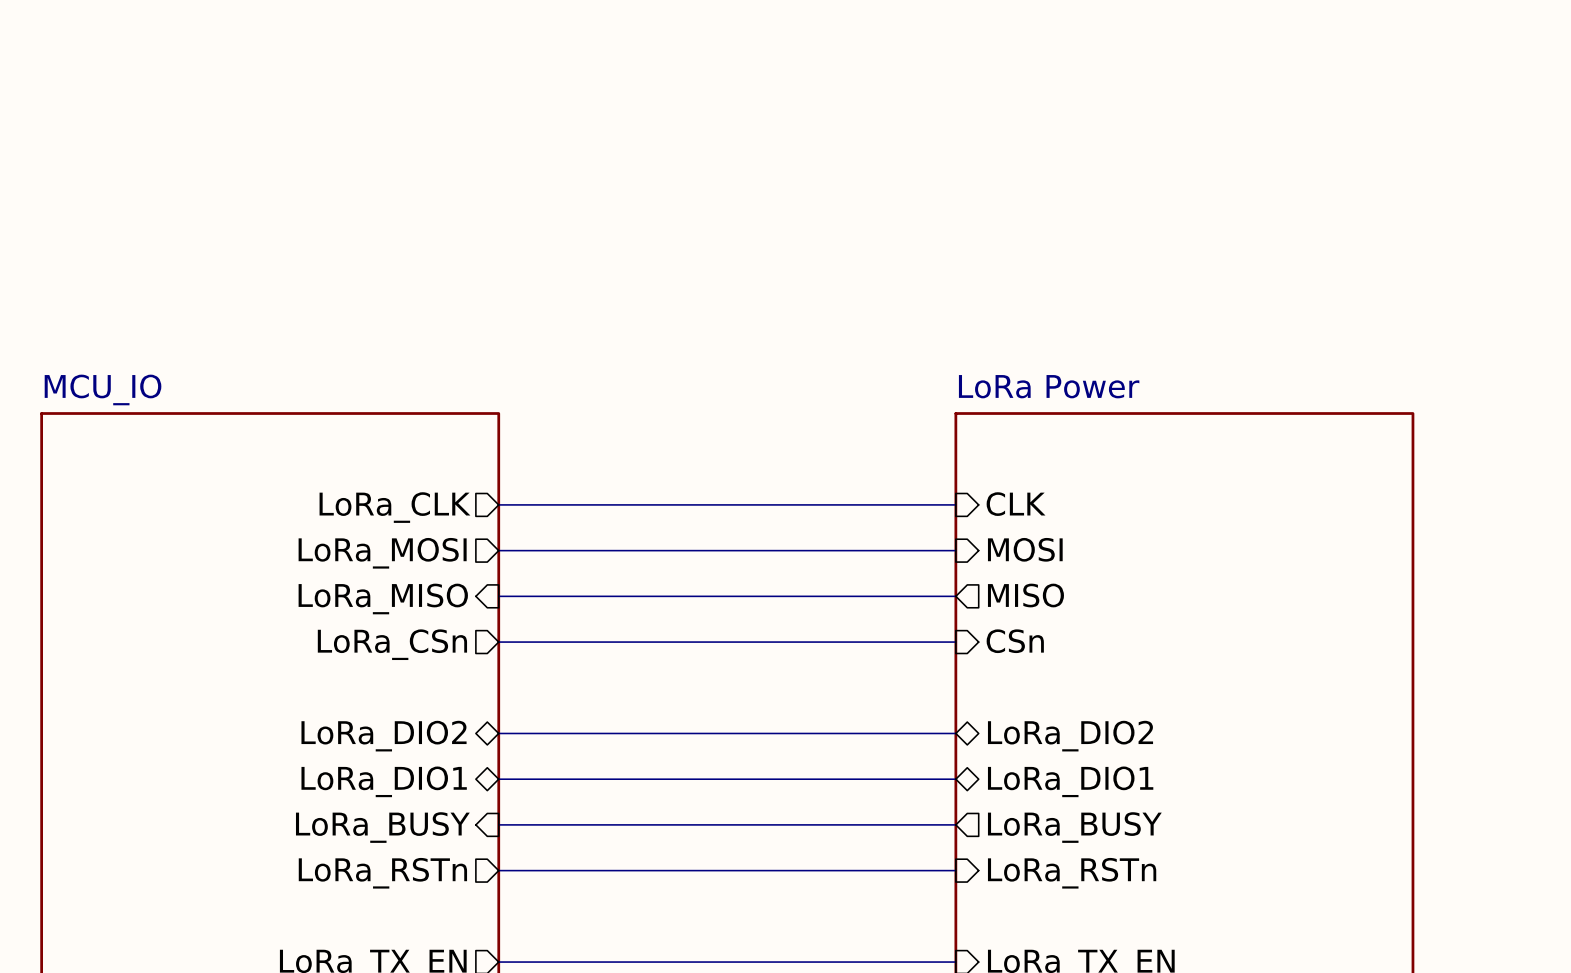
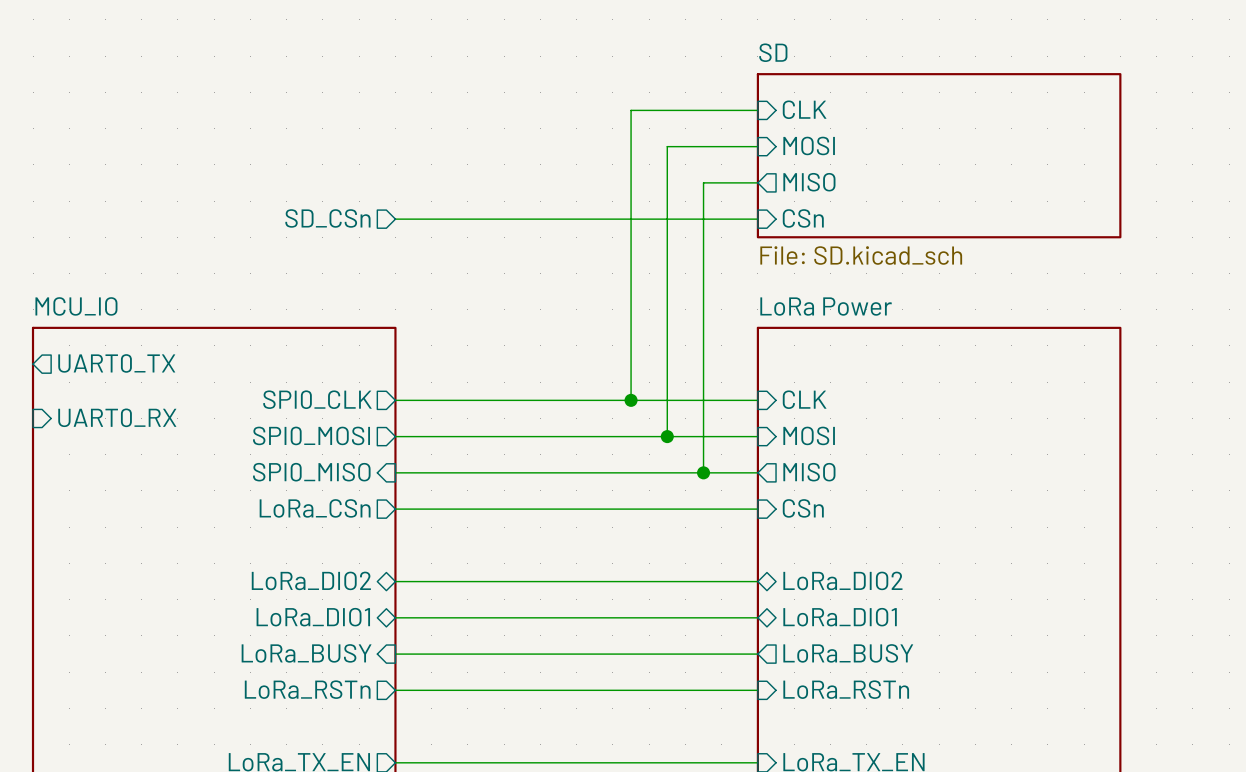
sheet pin: none -> CLK (804, 109)
wire: none -> (757, 110) (631, 110) (631, 400)
wire: none -> (757, 146) (667, 146) (667, 436)
sheet pin: none -> MOSI (809, 145)
sheet SD: none -> File: SD.kicad_sch (939, 155)
sheet pin: none -> MISO (809, 182)
wire: none -> (757, 182) (703, 182) (703, 472)
sheet pin: none -> CSn (803, 218)
wire: none -> (395, 219) (757, 219)
sheet pin: none -> SD_CSn (327, 218)
sheet pin: none -> UART0_TX (116, 363)
junction: none -> (631, 400)
sheet pin: LoRa_CLK (394, 507) -> SPI0_CLK (317, 399)
sheet pin: none -> UART0_RX (117, 417)
junction: none -> (667, 436)
sheet pin: LoRa_MOSI (382, 553) -> SPI0_MOSI (311, 435)
junction: none -> (703, 472)
sheet pin: LoRa_MISO (383, 598) -> SPI0_MISO (311, 472)

